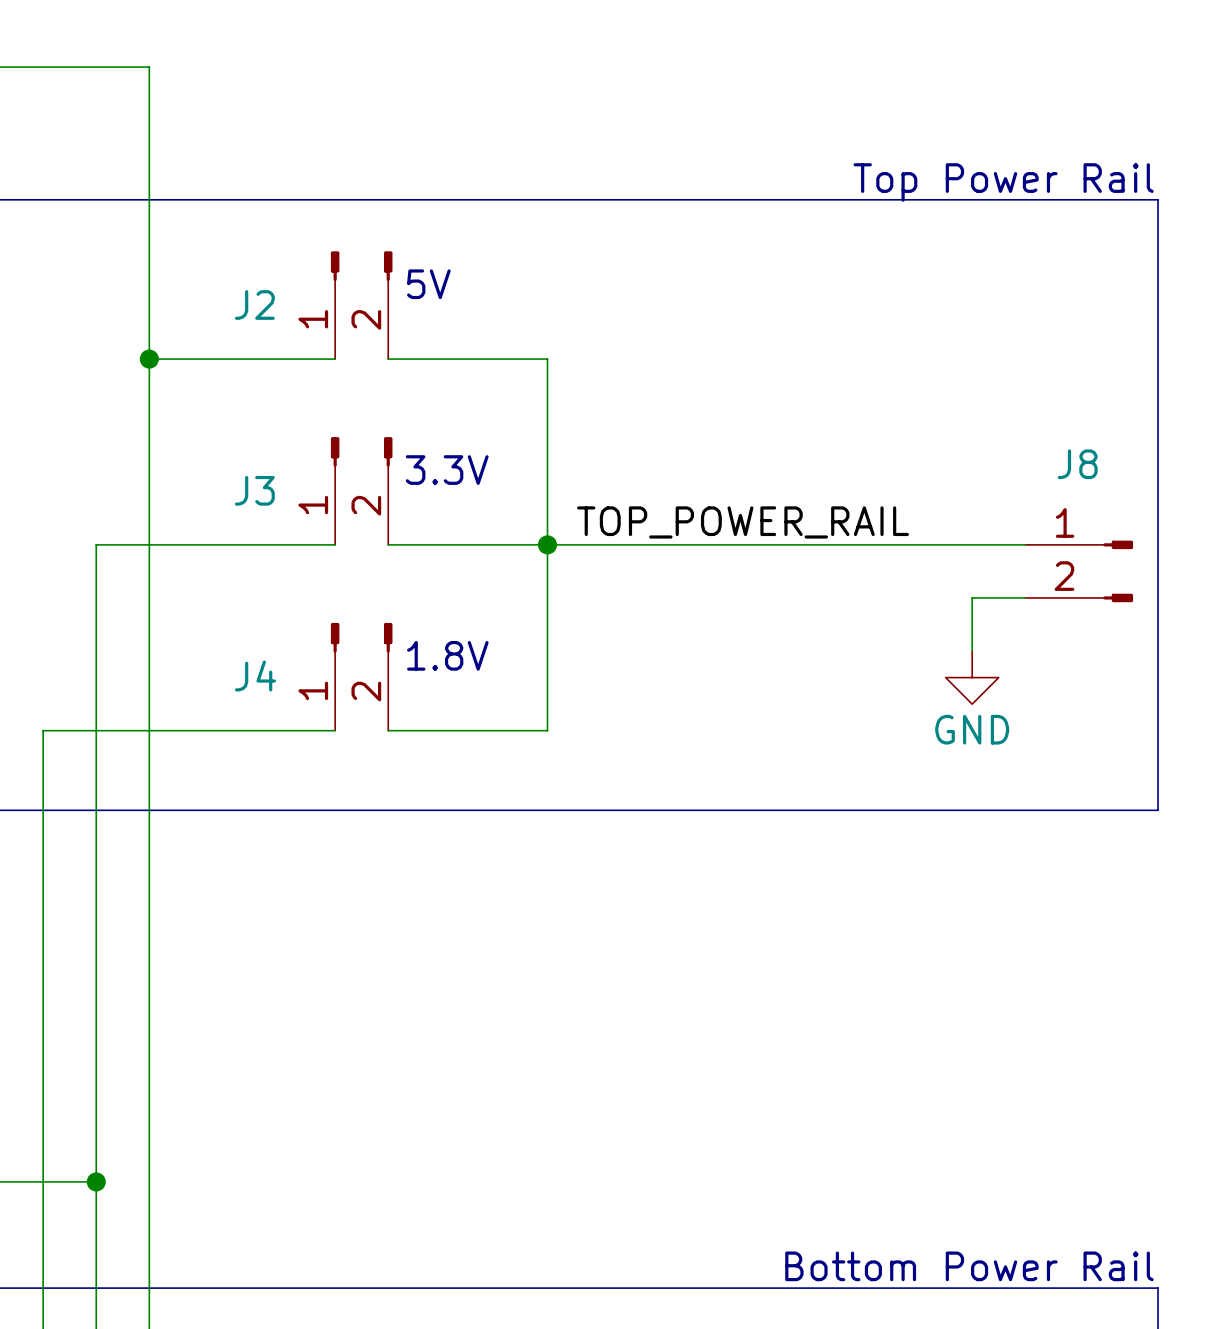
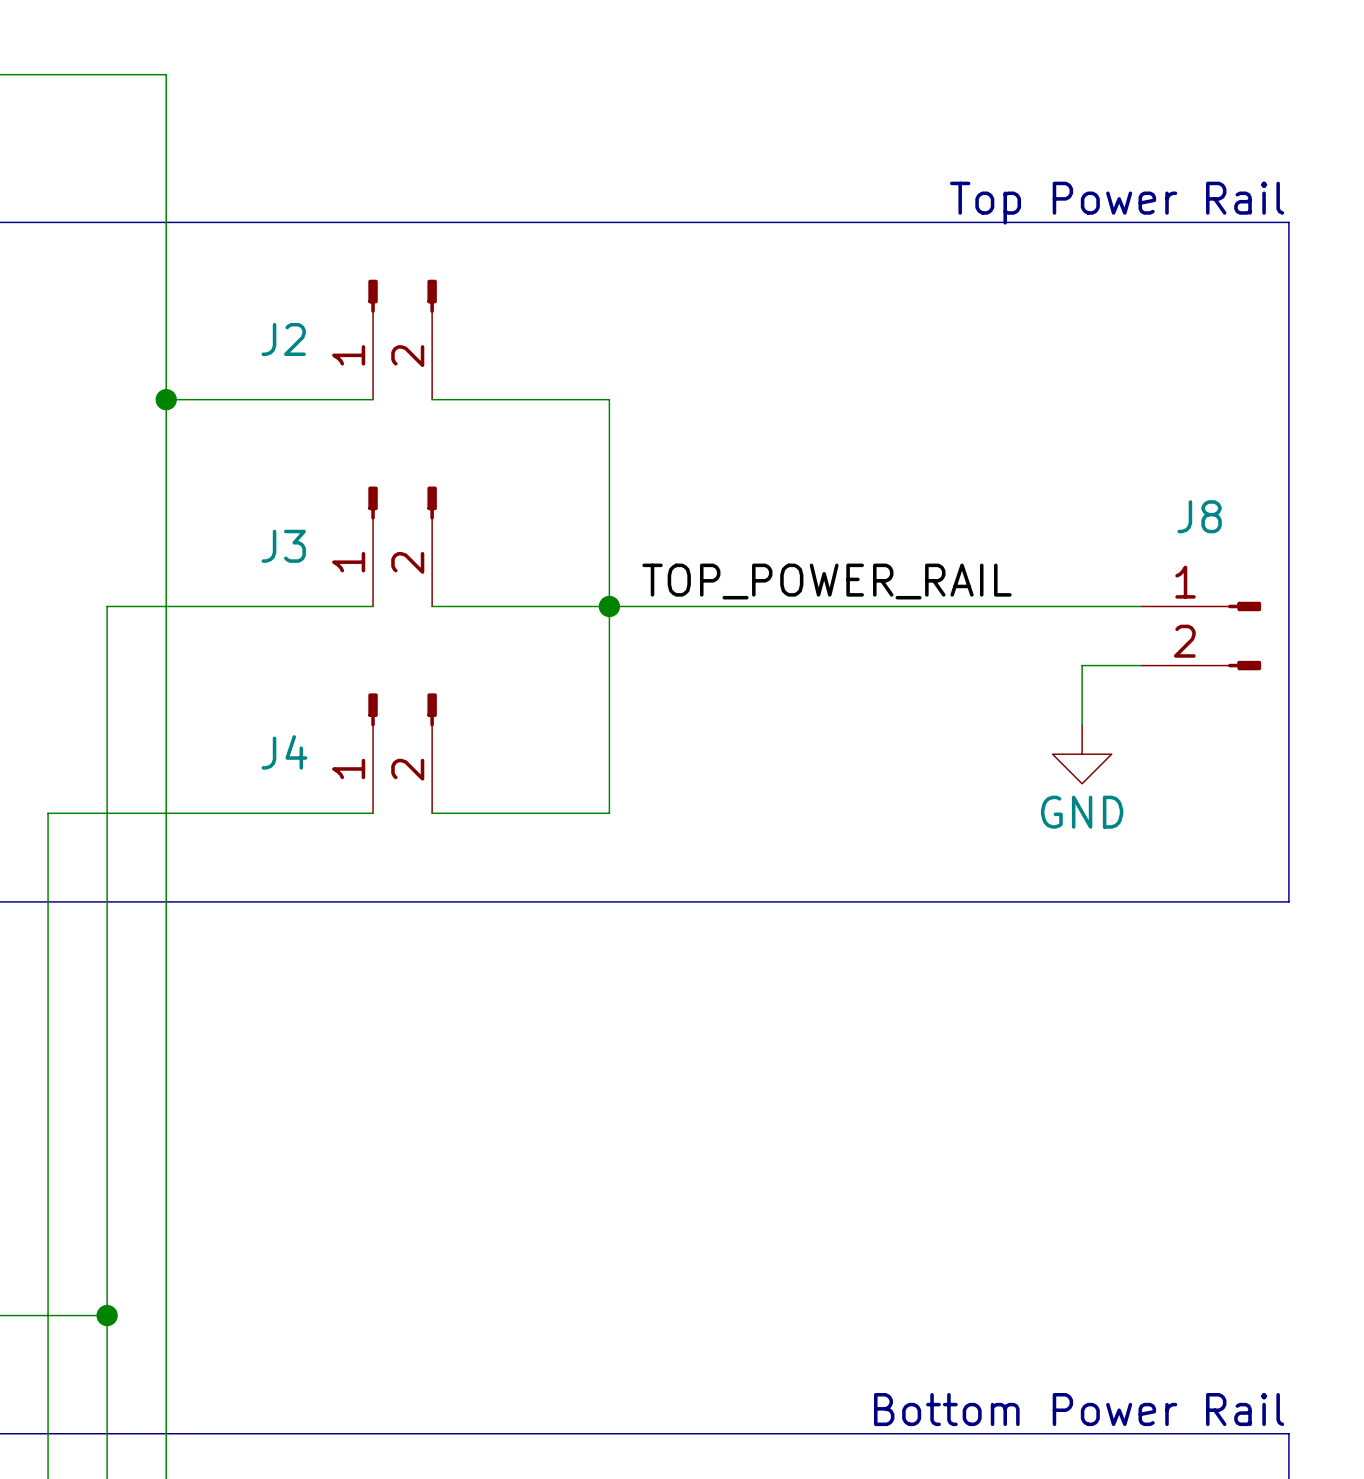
text: 5V (428, 284) -> none
text: 3.3V (447, 470) -> none
text: 1.8V (447, 655) -> none

